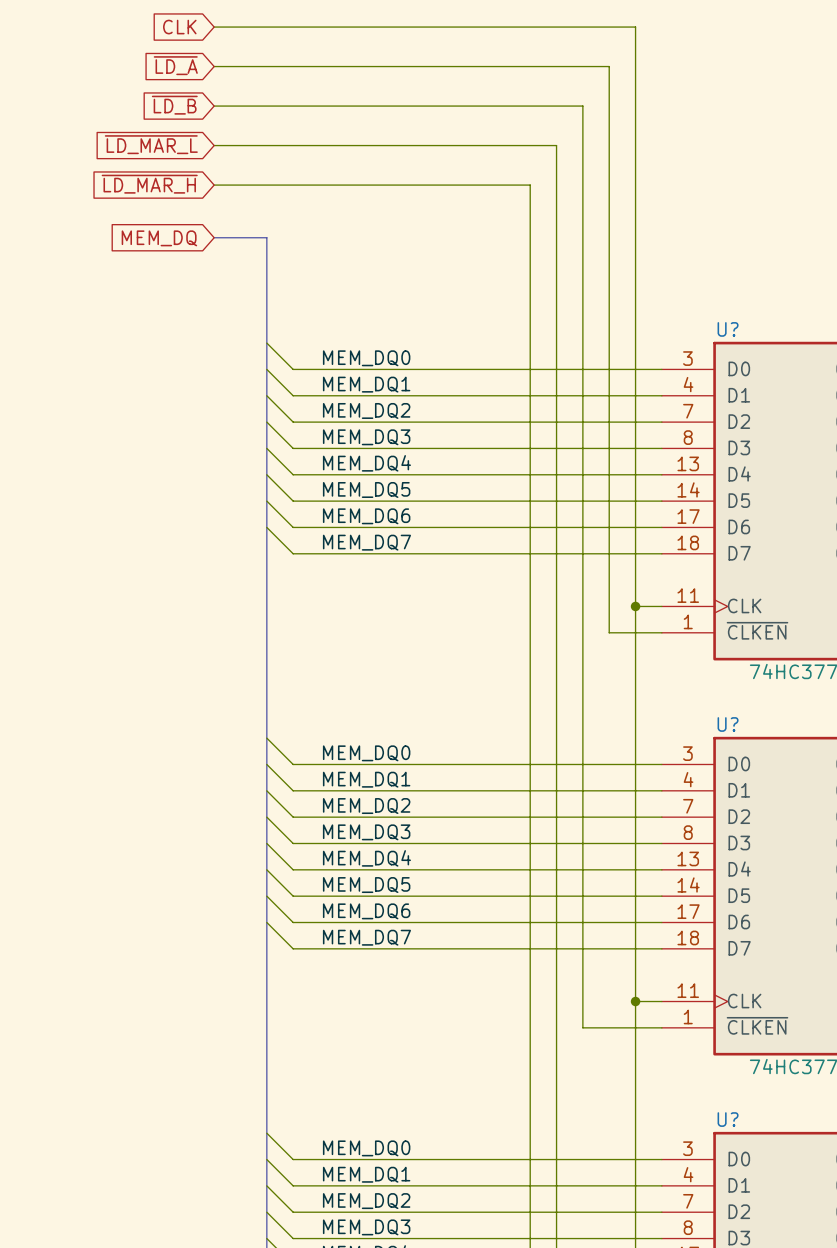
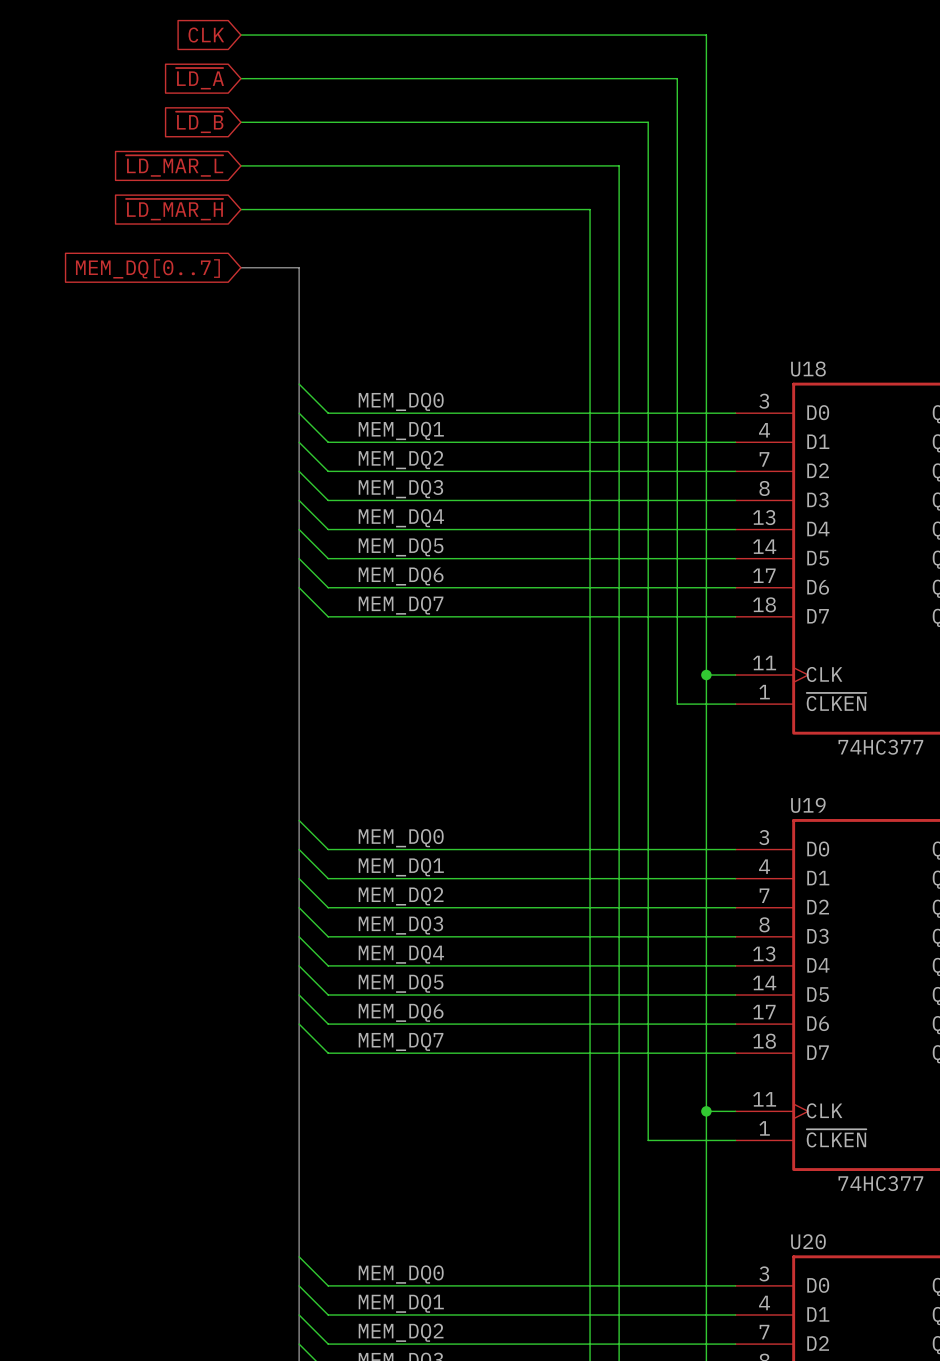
global label: MEM_DQ (159, 238) -> MEM_DQ[0..7] (147, 268)
U? name: U? (728, 329) -> U18 (808, 369)
U? name: U? (728, 724) -> U19 (808, 805)
U? name: U? (728, 1119) -> U20 (808, 1241)

